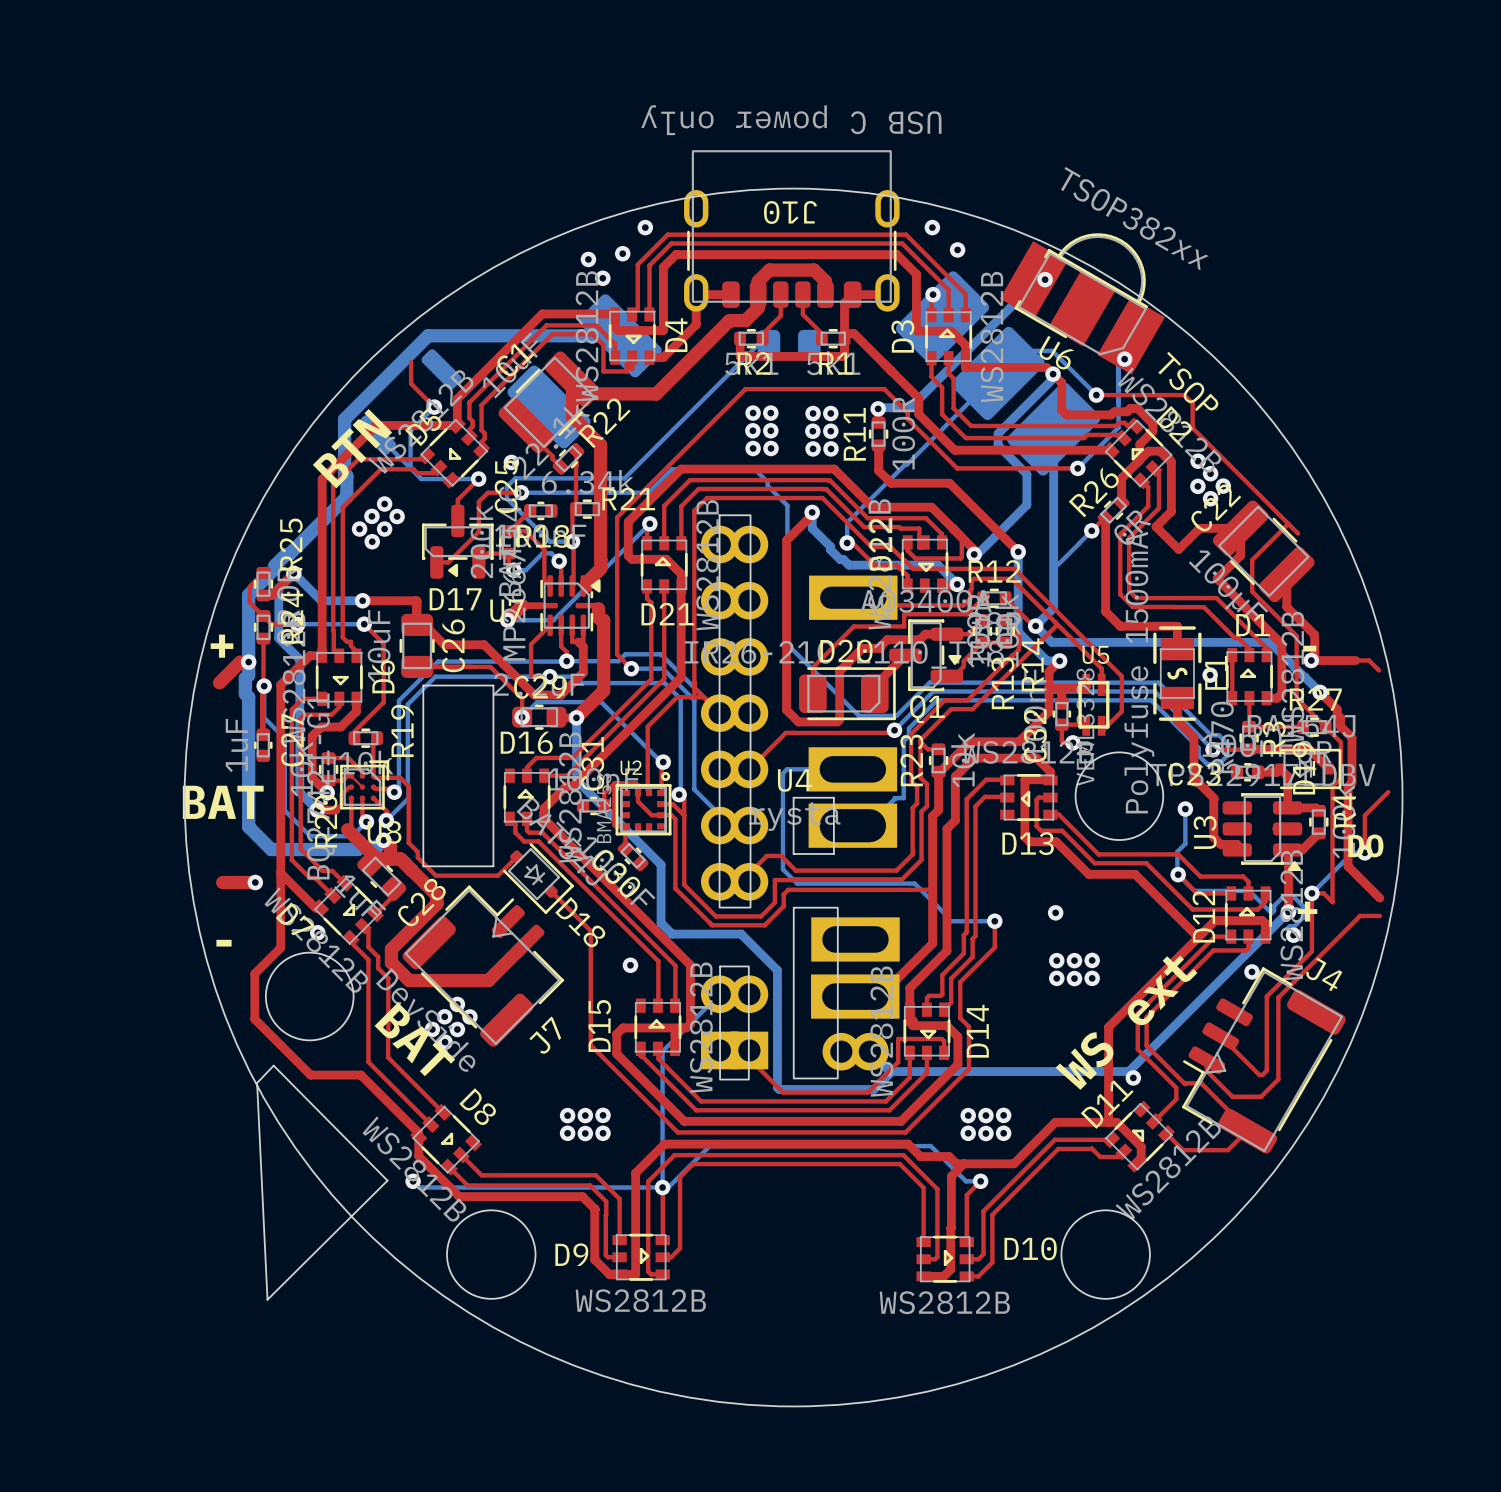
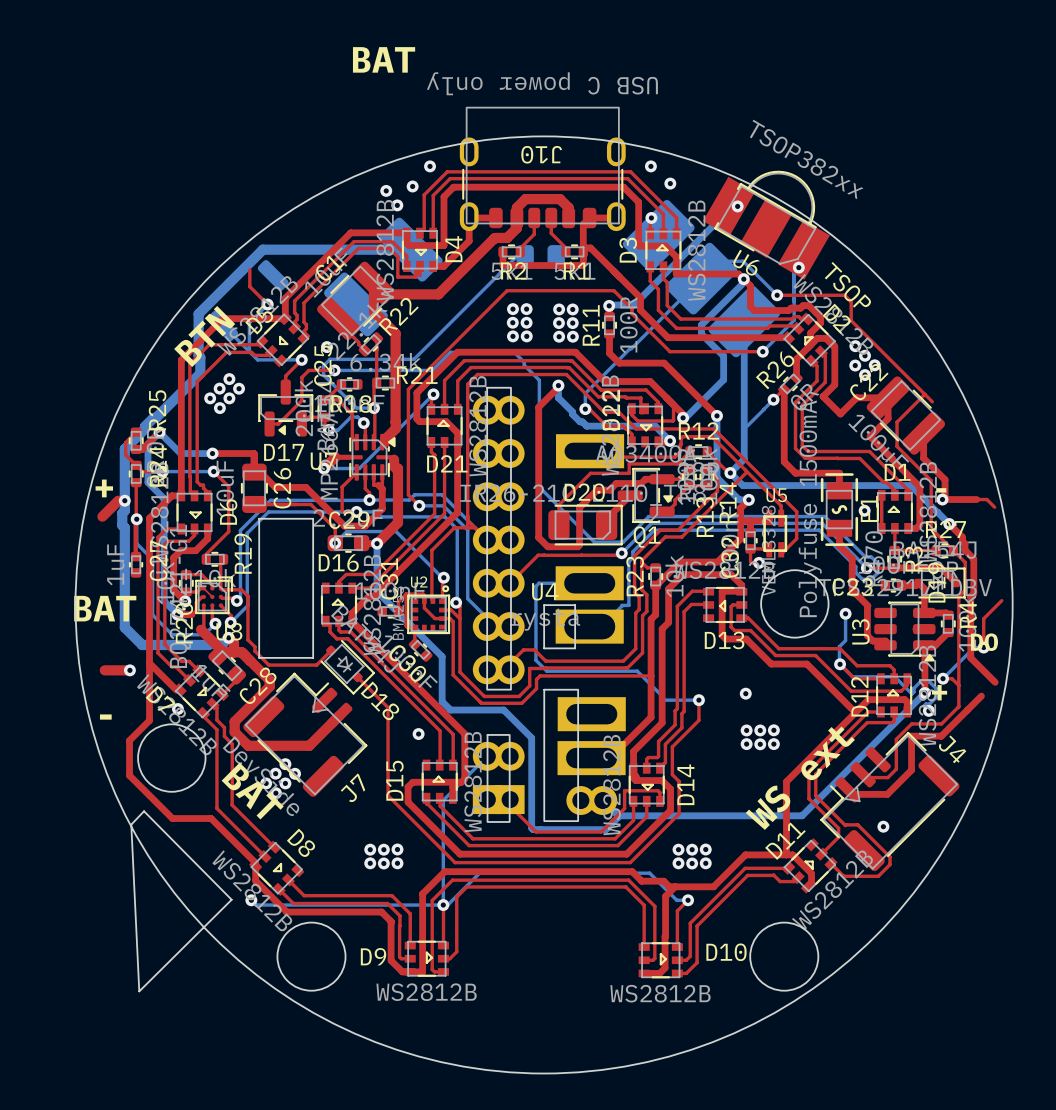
text: none -> BAT (384, 59)
top track: (1311, 893) (1311, 951) (1266, 996) (1266, 1070) (1259, 1075) (1220, 1036) -> none
top track: none -> (958, 685) (958, 706) (941, 723) (911, 723) (896, 739) (896, 769) (887, 777) (865, 777)
top track: none -> (981, 696) (941, 736) (911, 736) (911, 770) (887, 794) (852, 794)
top track: (1379, 915) (1360, 915) (1278, 997) (1278, 1079) (1261, 1096) (1232, 1096) (1206, 1071) (1206, 1060) -> none
via: (1251, 971) -> none
J4 rotation: 0° (1263, 1060) -> 15° clockwise (889, 801)
via: (1133, 1077) -> none
via: none -> (883, 826)

